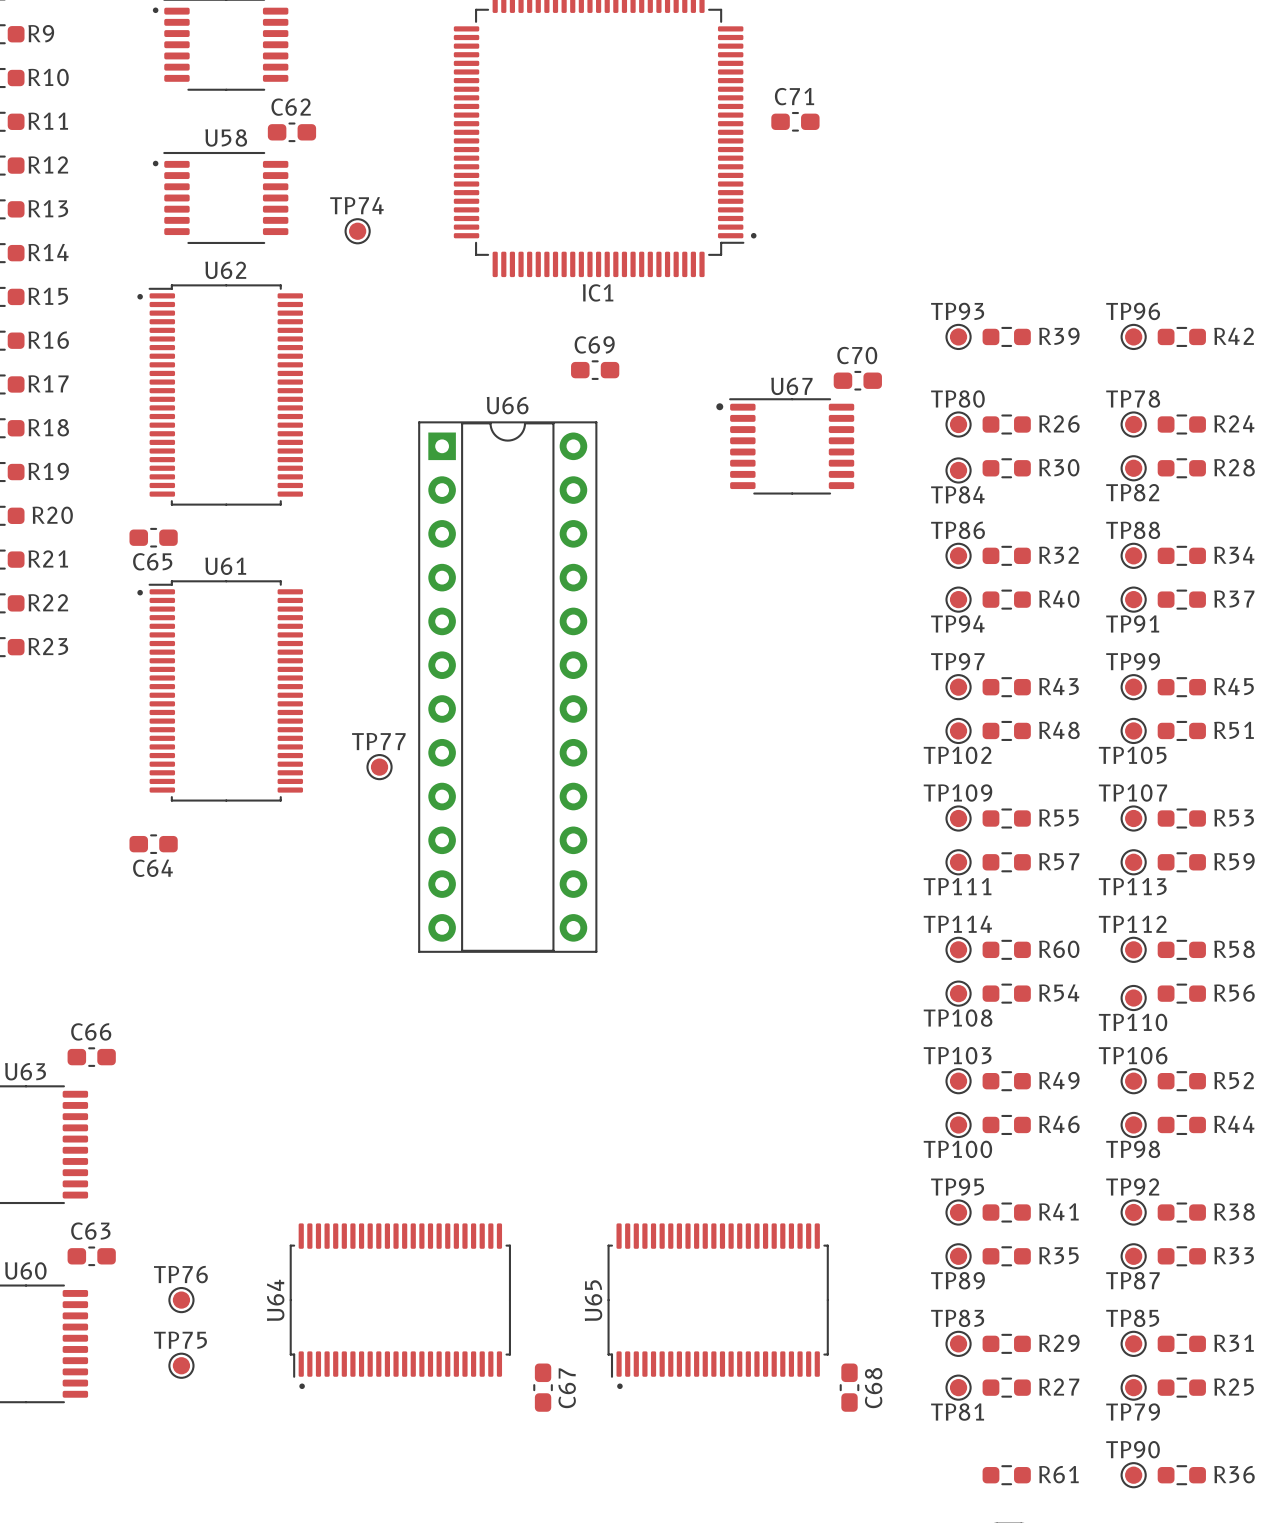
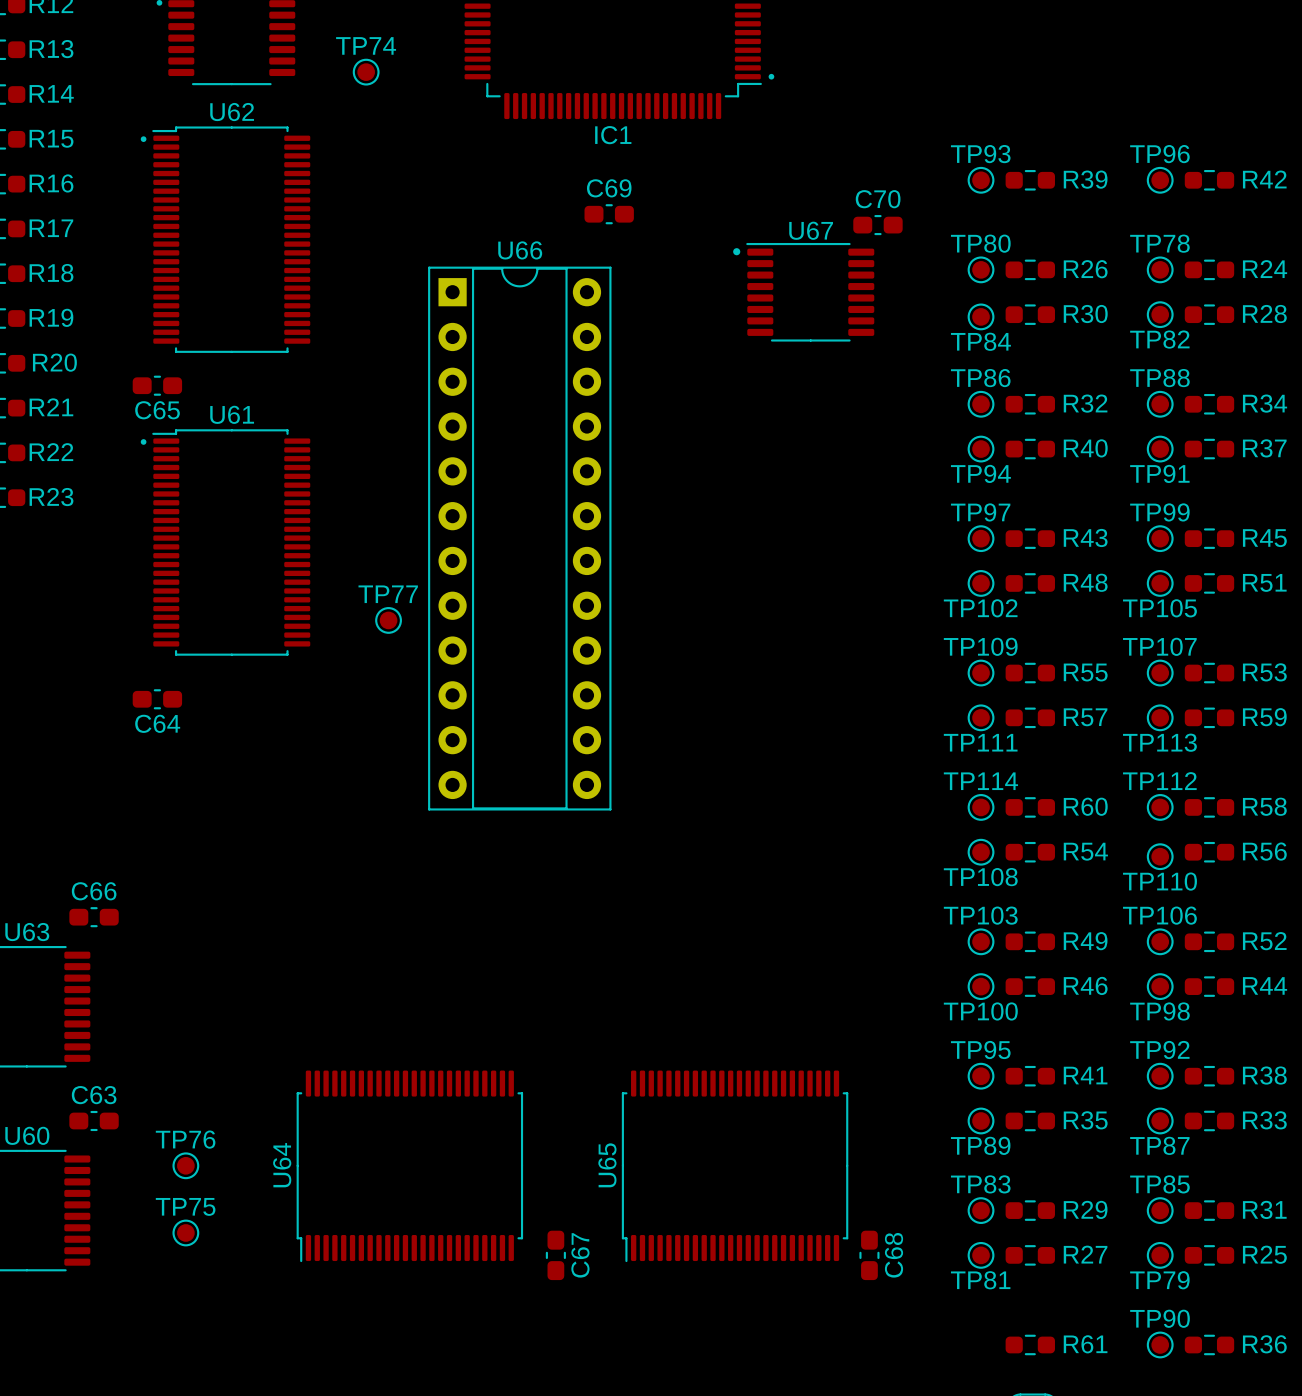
U64 footprint: [289, 1223, 511, 1390] -> [296, 1070, 524, 1263]
U65 footprint: [607, 1223, 829, 1390] -> [621, 1070, 849, 1263]

